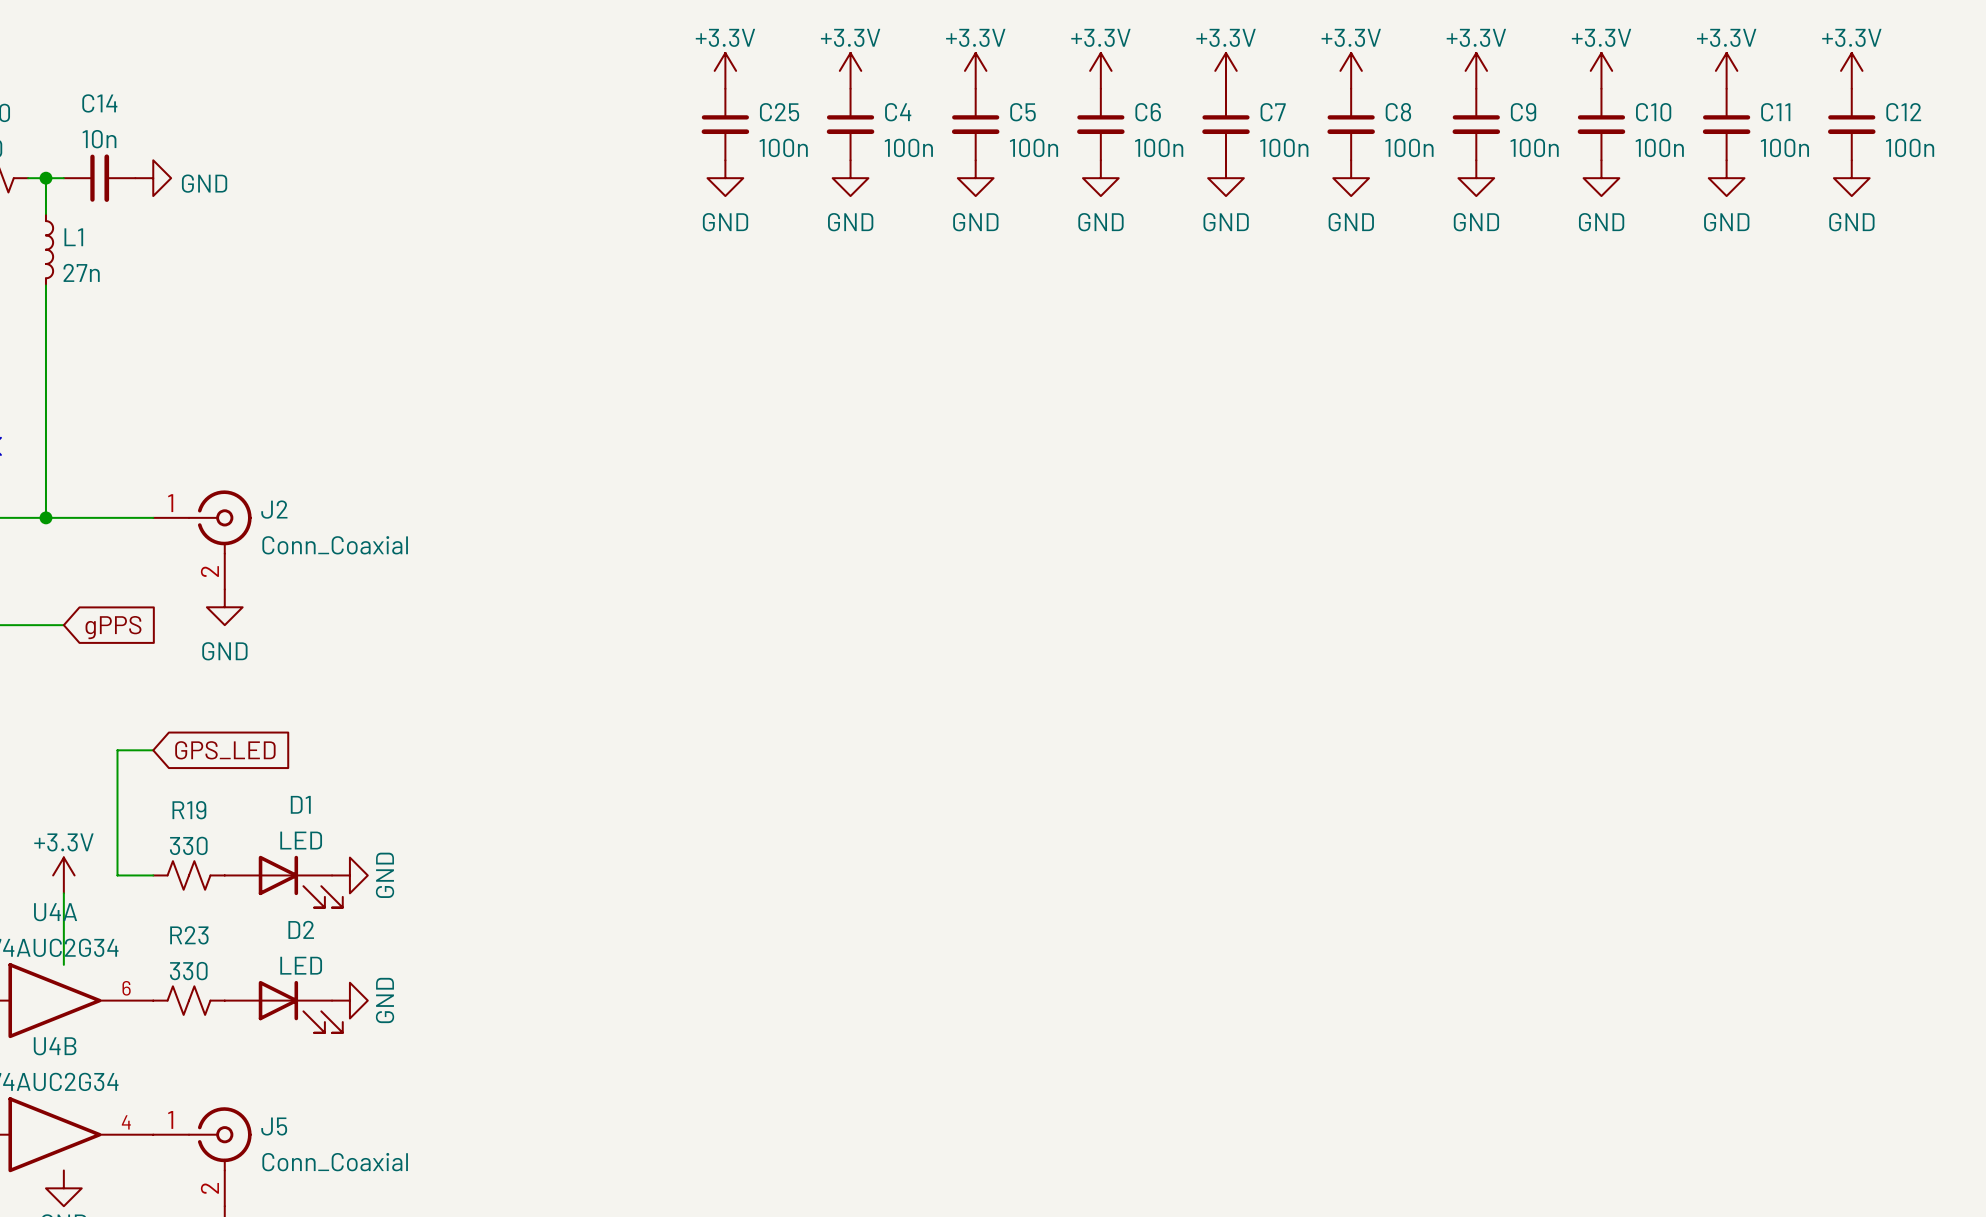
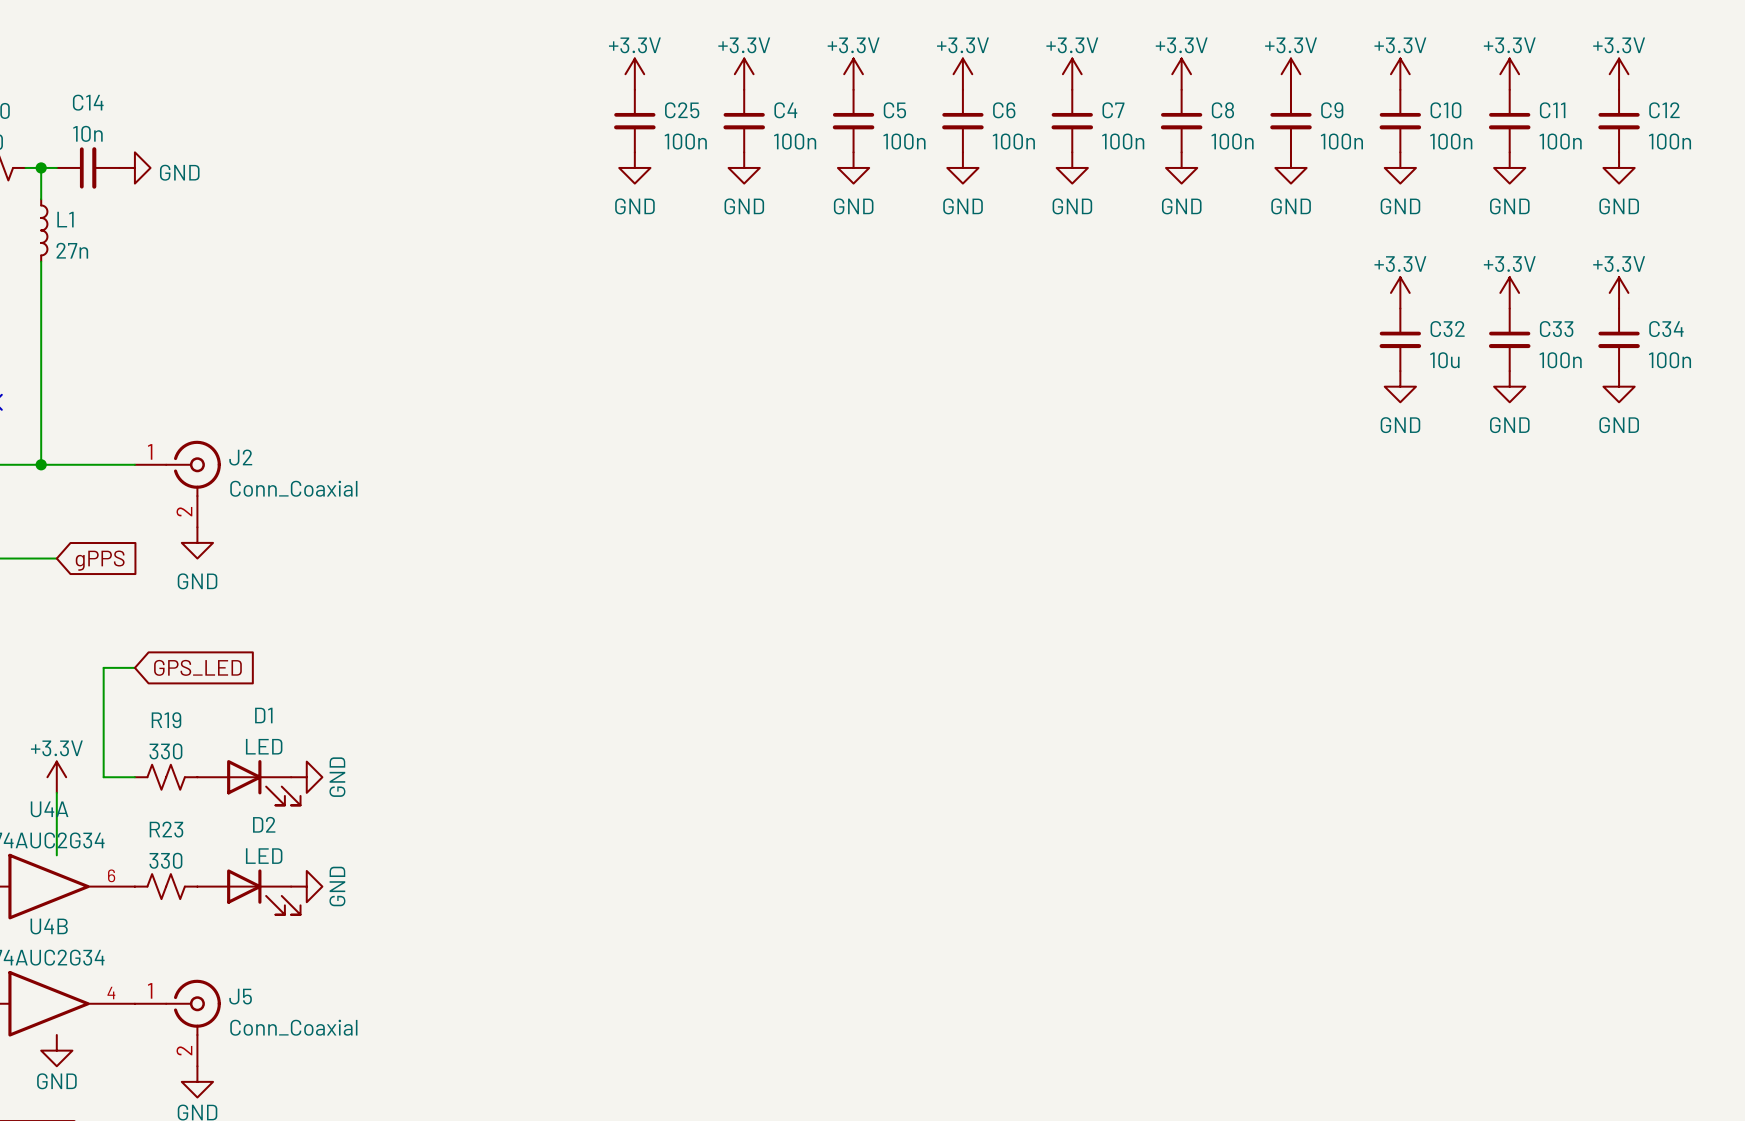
power symbol: none -> +3.3V (1400, 292)
power symbol: none -> +3.3V (1509, 292)
power symbol: none -> +3.3V (1619, 292)
C32: none -> 10u (1400, 339)
C33: none -> 100n (1509, 339)
C34: none -> 100n (1619, 339)
power symbol: none -> GND (1400, 386)
power symbol: none -> GND (1509, 386)
power symbol: none -> GND (1619, 386)

